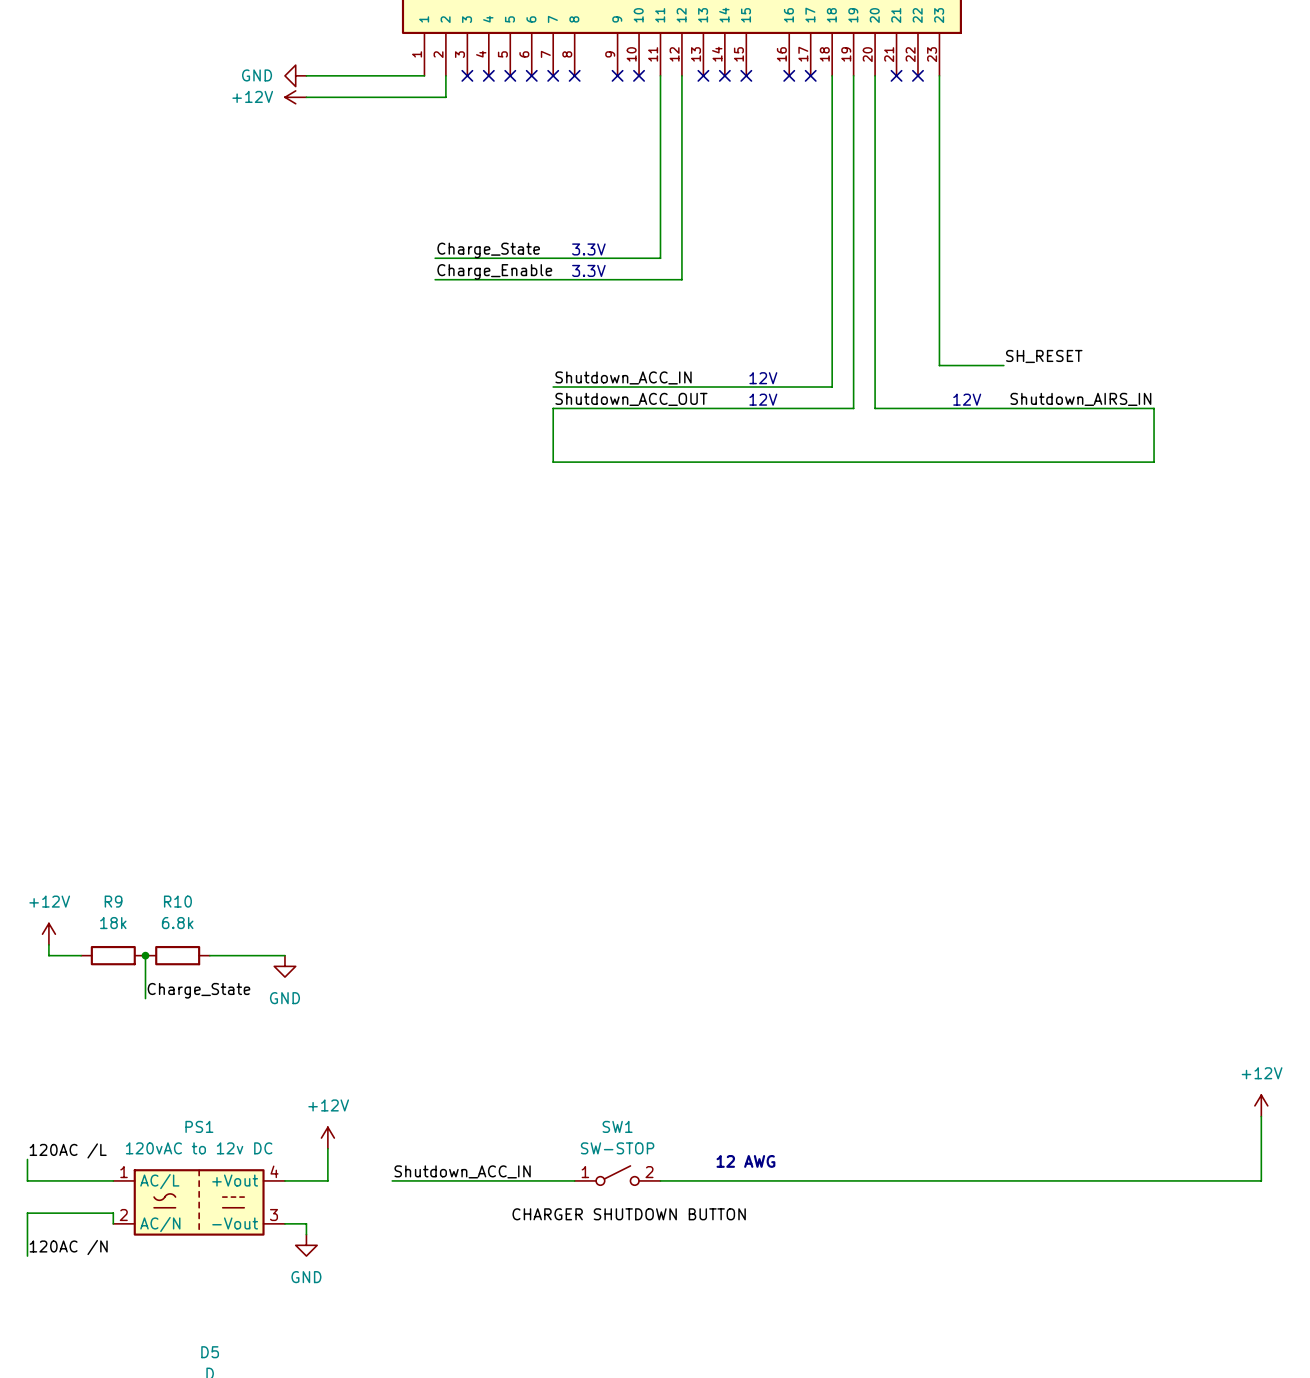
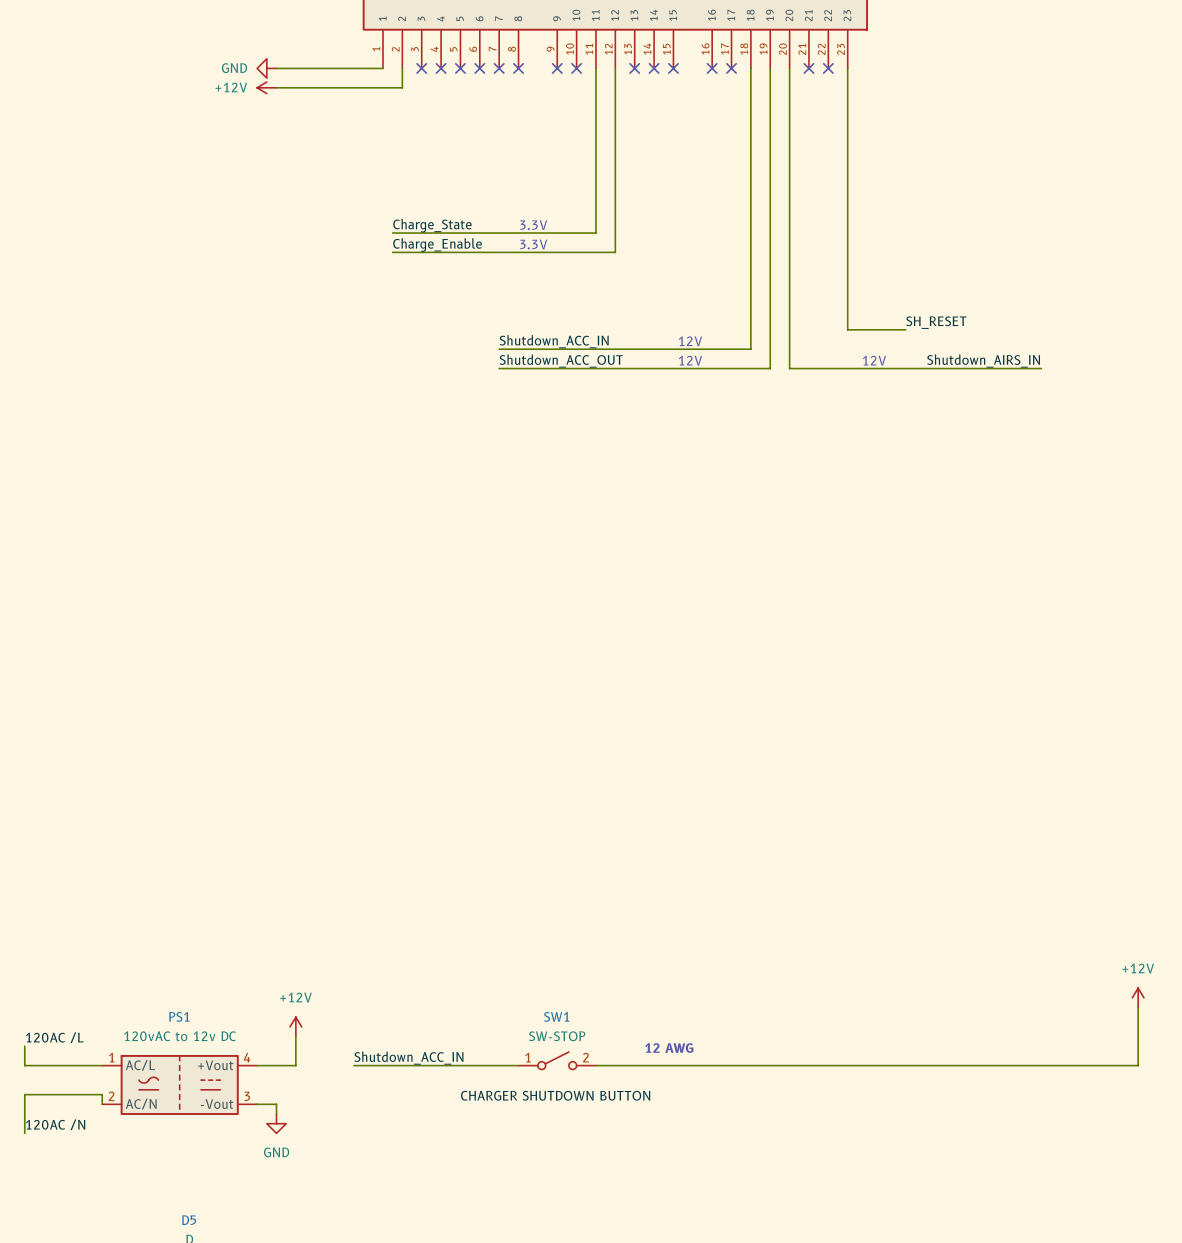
wire: (553, 408) (553, 462) (1154, 462) (1154, 408) -> none
power symbol: +12V (48, 934) -> none
wire: (48, 944) (48, 955) (81, 955) -> none
R9: 18k (113, 955) -> none
wire: (145, 955) (145, 998) -> none
junction: (145, 955) -> none
R10: 6.8k (177, 955) -> none
wire: (209, 955) (284, 955) -> none
power symbol: GND (284, 966) -> none
label: Charge_State (198, 990) -> none

